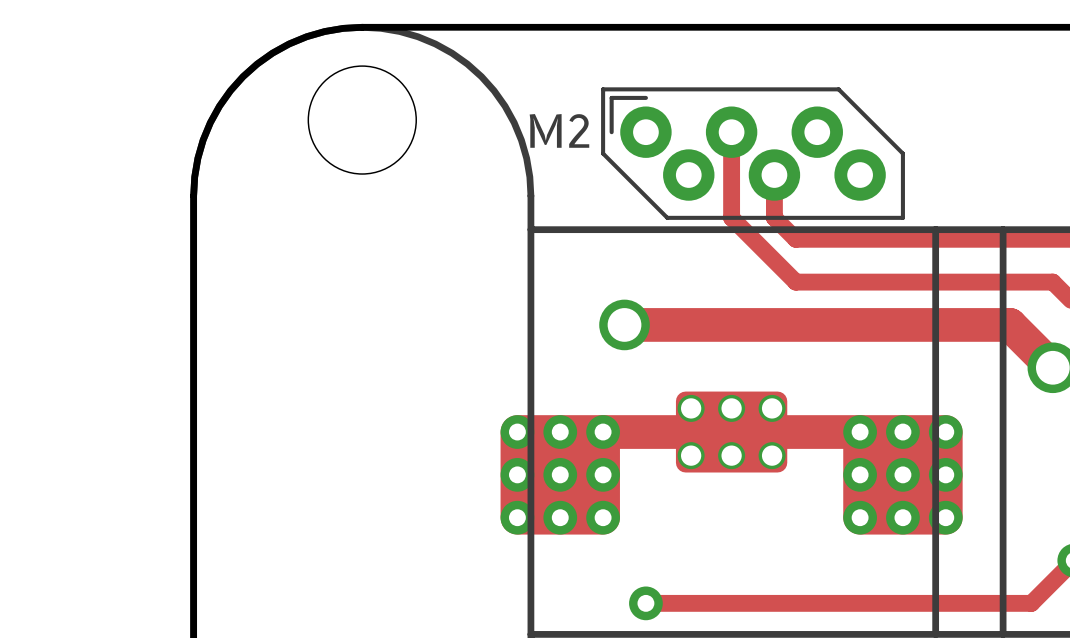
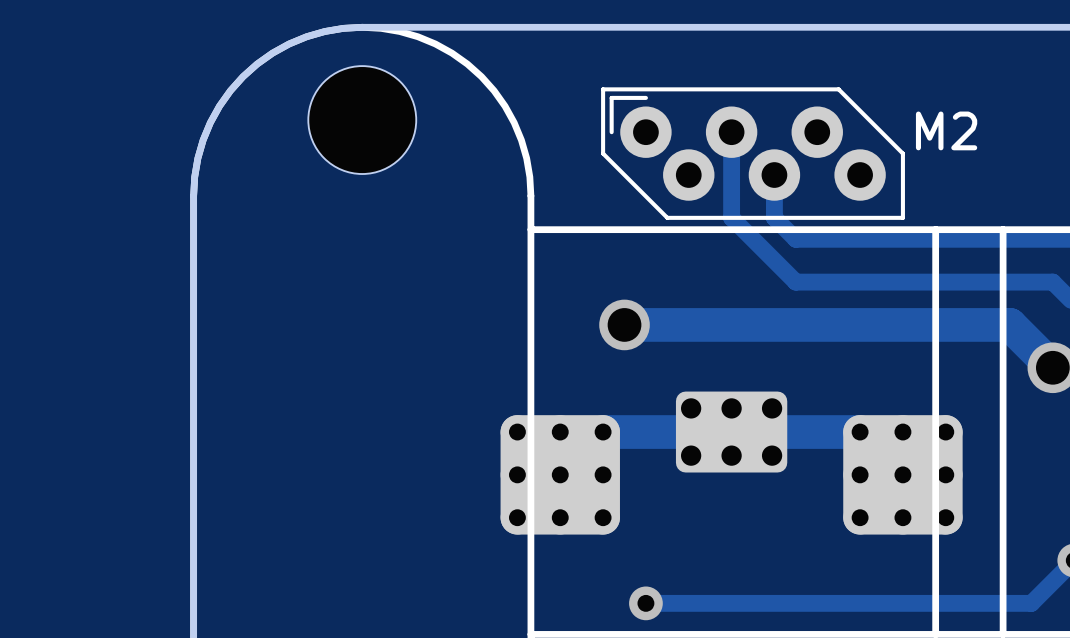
M2 name position: M2 (559, 130) -> M2 (946, 130)

